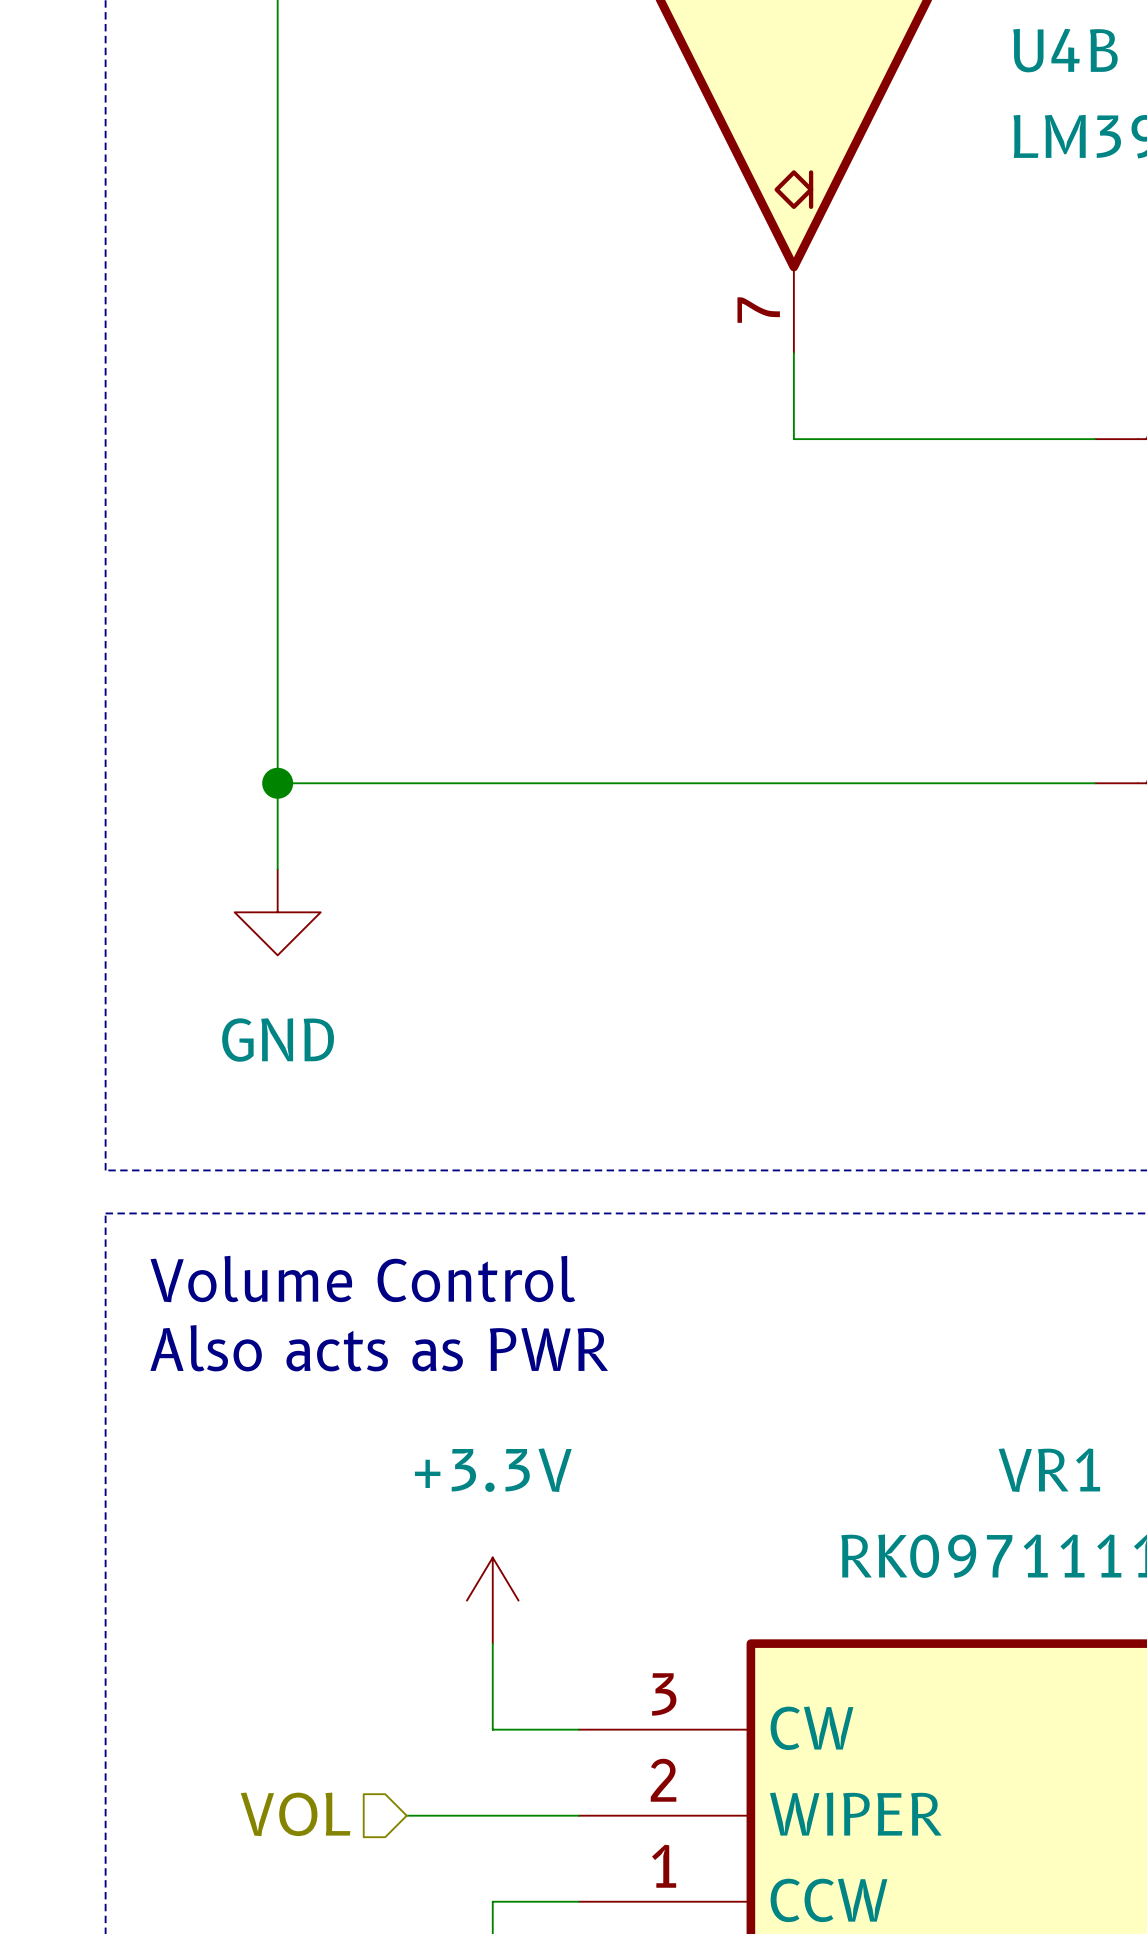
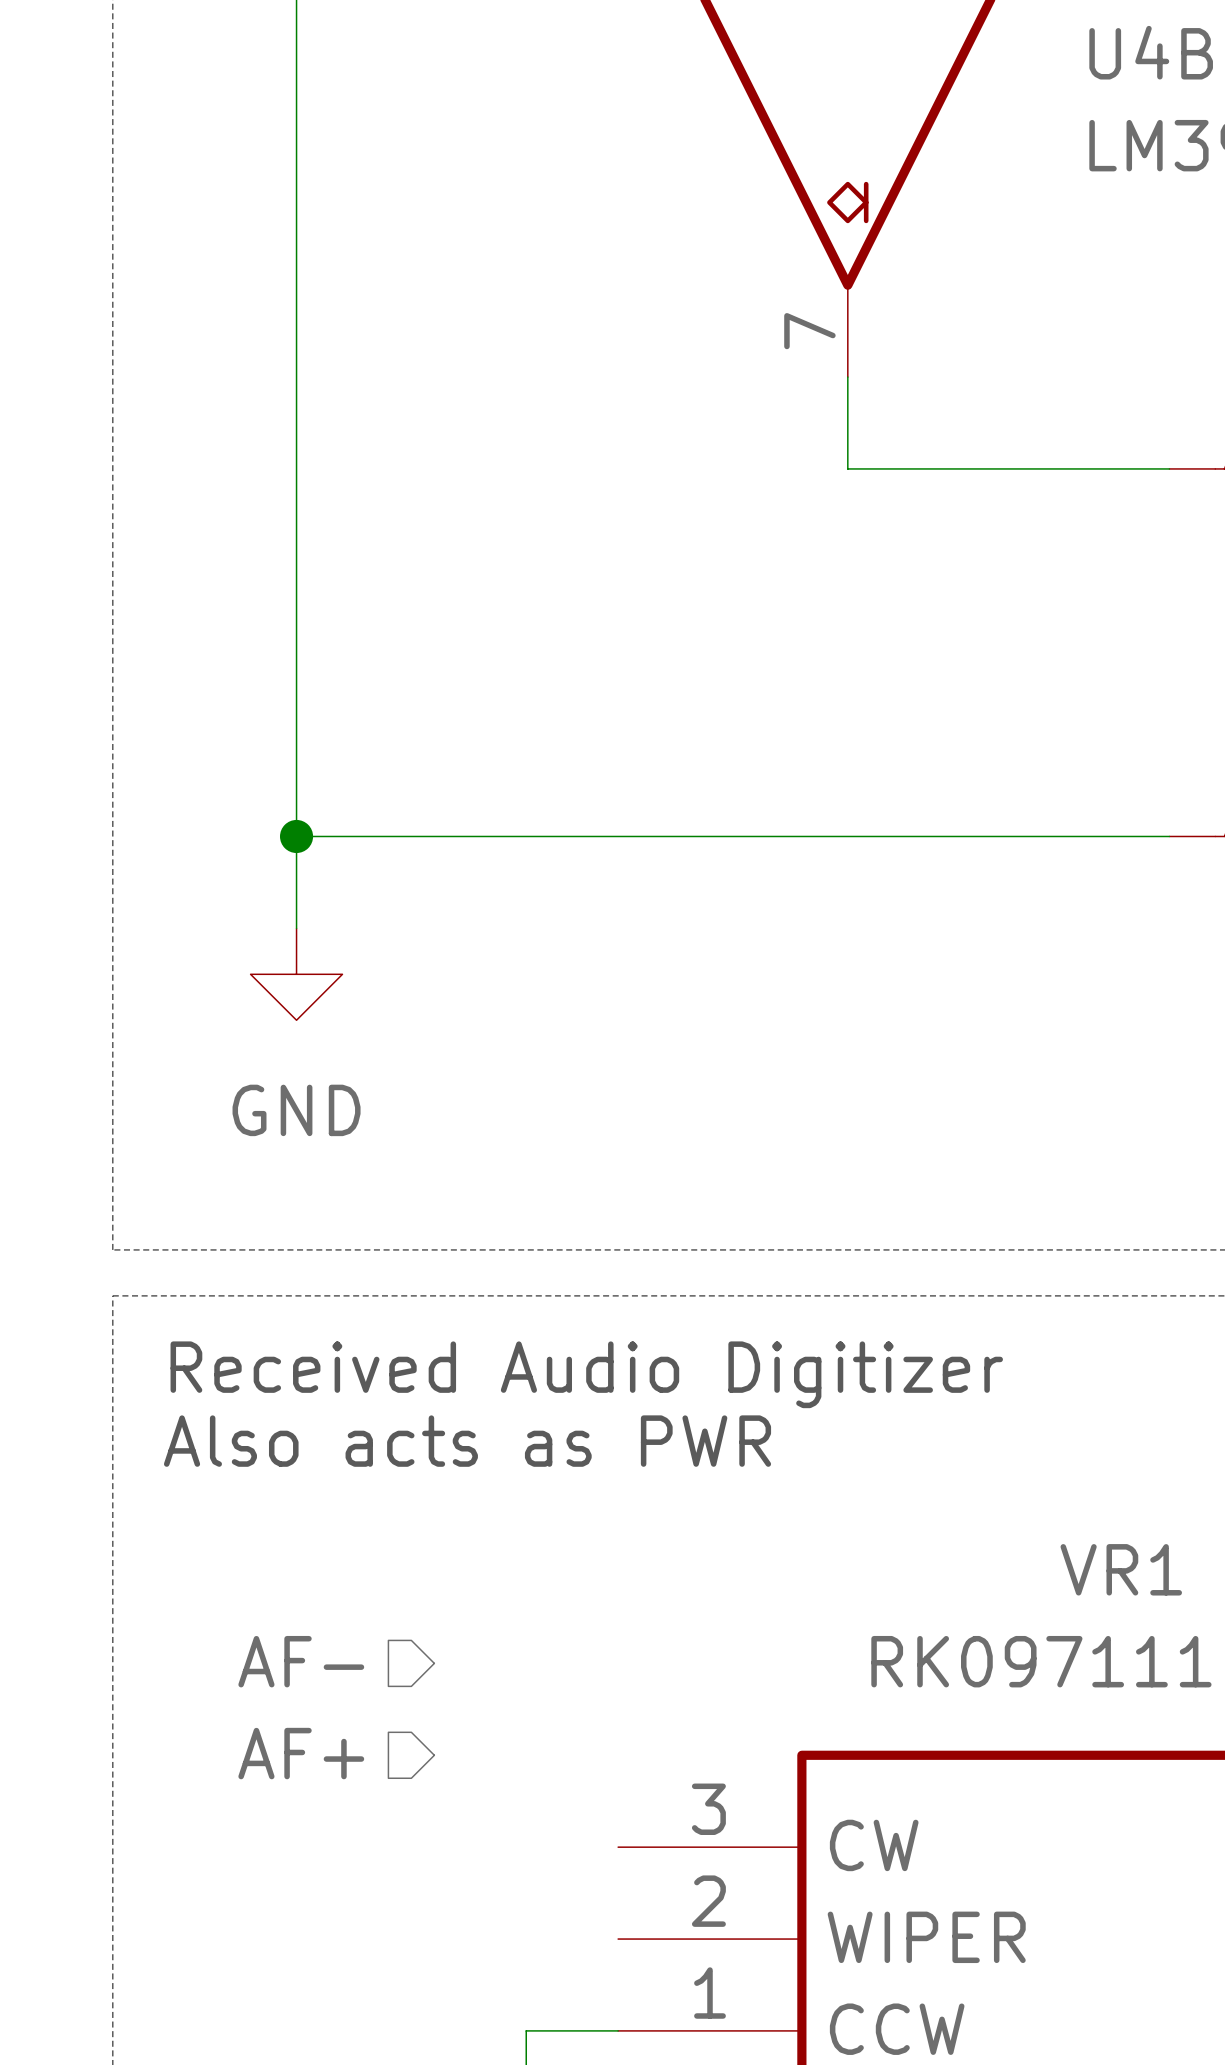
text: Volume Control (362, 1279) -> Received Audio Digitizer (586, 1374)
hierarchical label: none -> AF- (301, 1661)
power symbol: +3.3V (492, 1600) -> none
hierarchical label: none -> AF+ (301, 1753)
wire: (492, 1643) (492, 1729) (578, 1729) -> none
hierarchical label: VOL (295, 1814) -> none
wire: (406, 1815) (578, 1815) -> none

